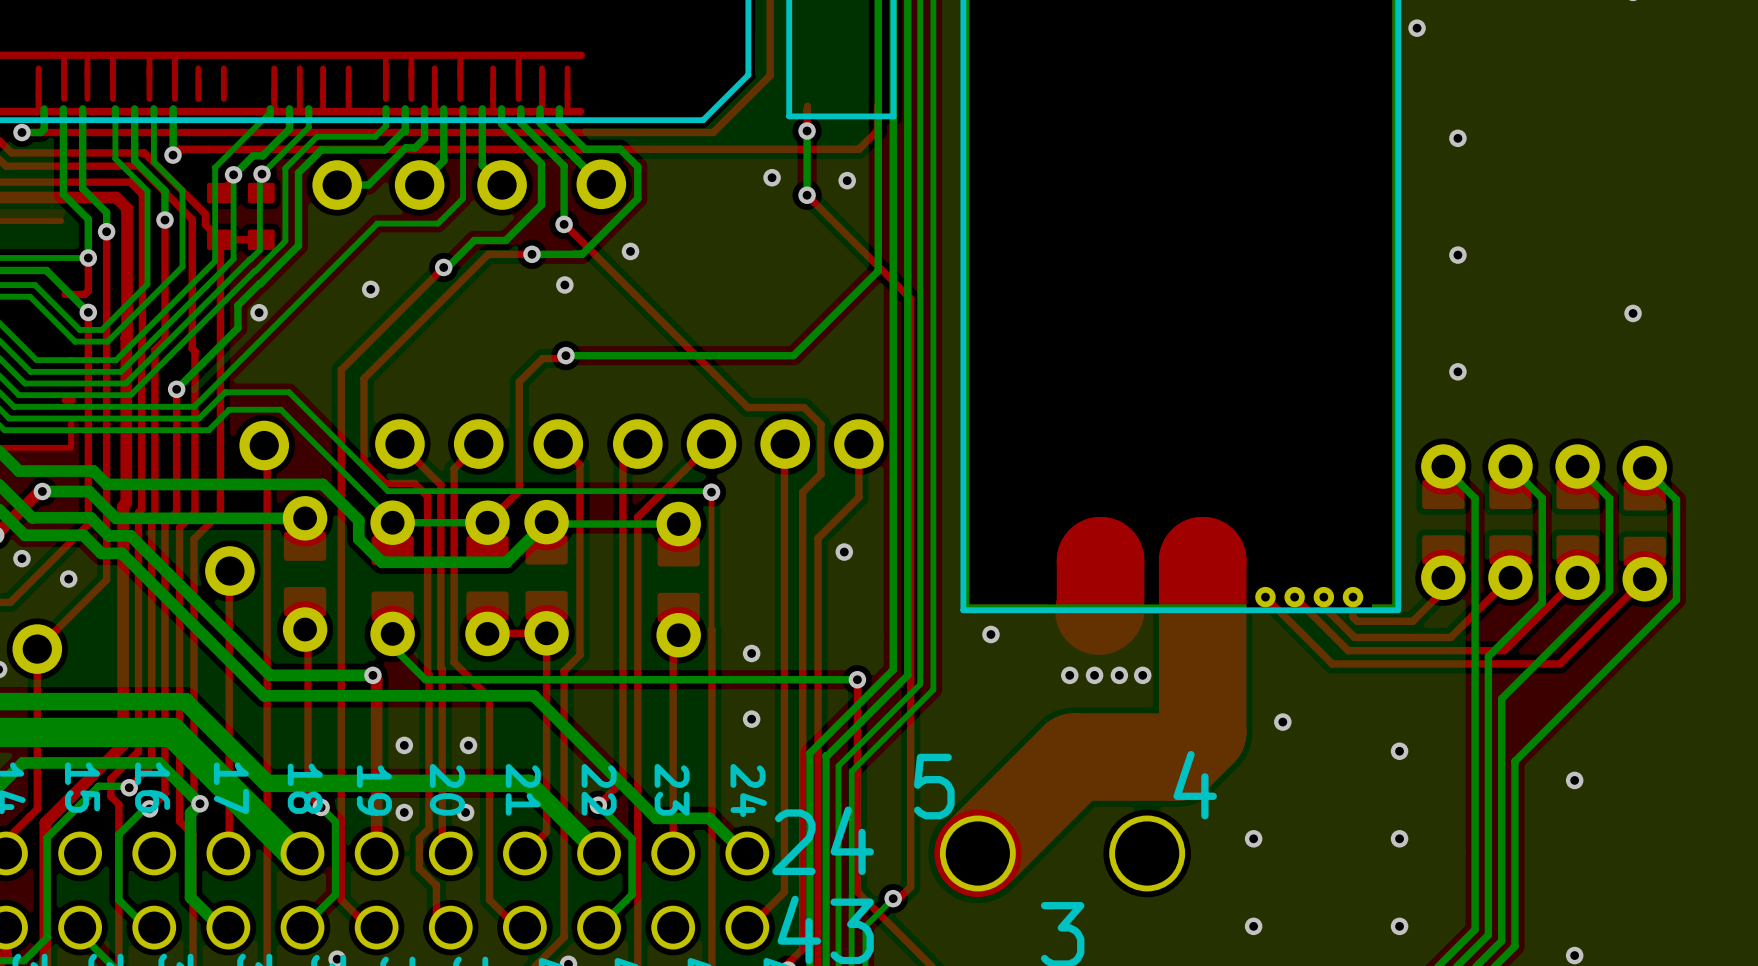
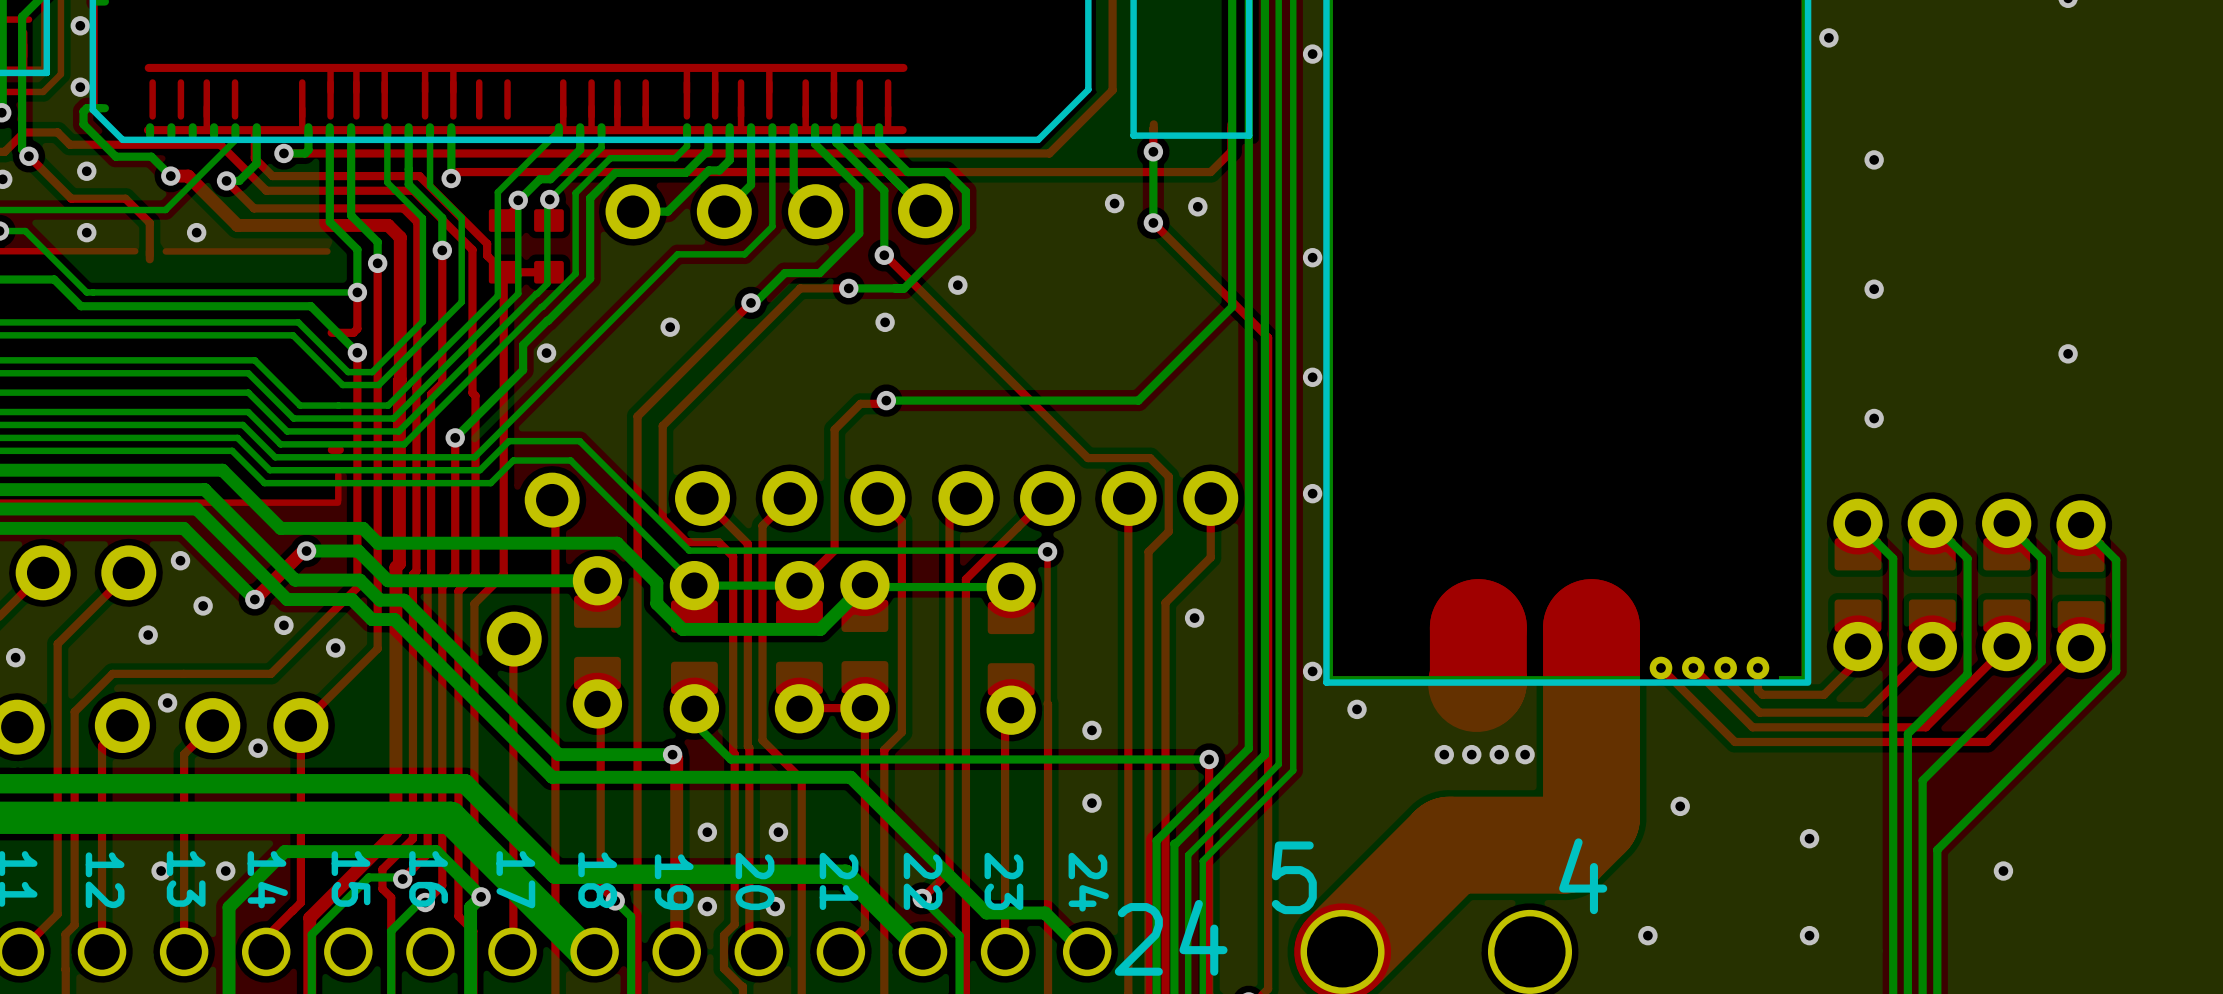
via: none -> (1312, 54)
via: none -> (1312, 257)
via: none -> (1312, 377)
via: none -> (1312, 493)
via: none -> (1312, 671)

